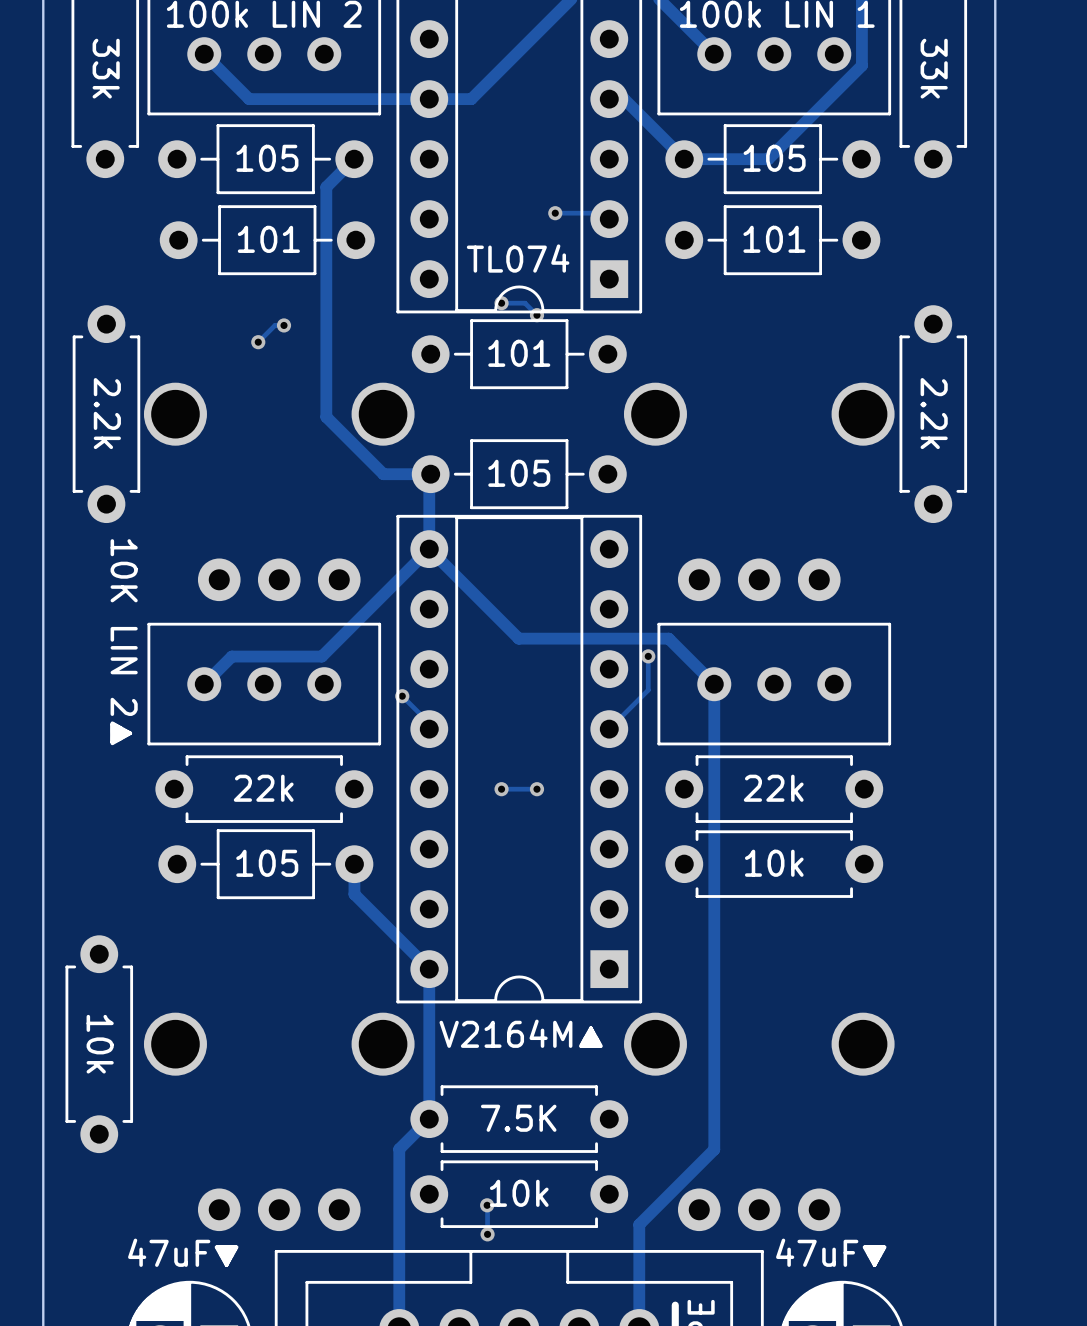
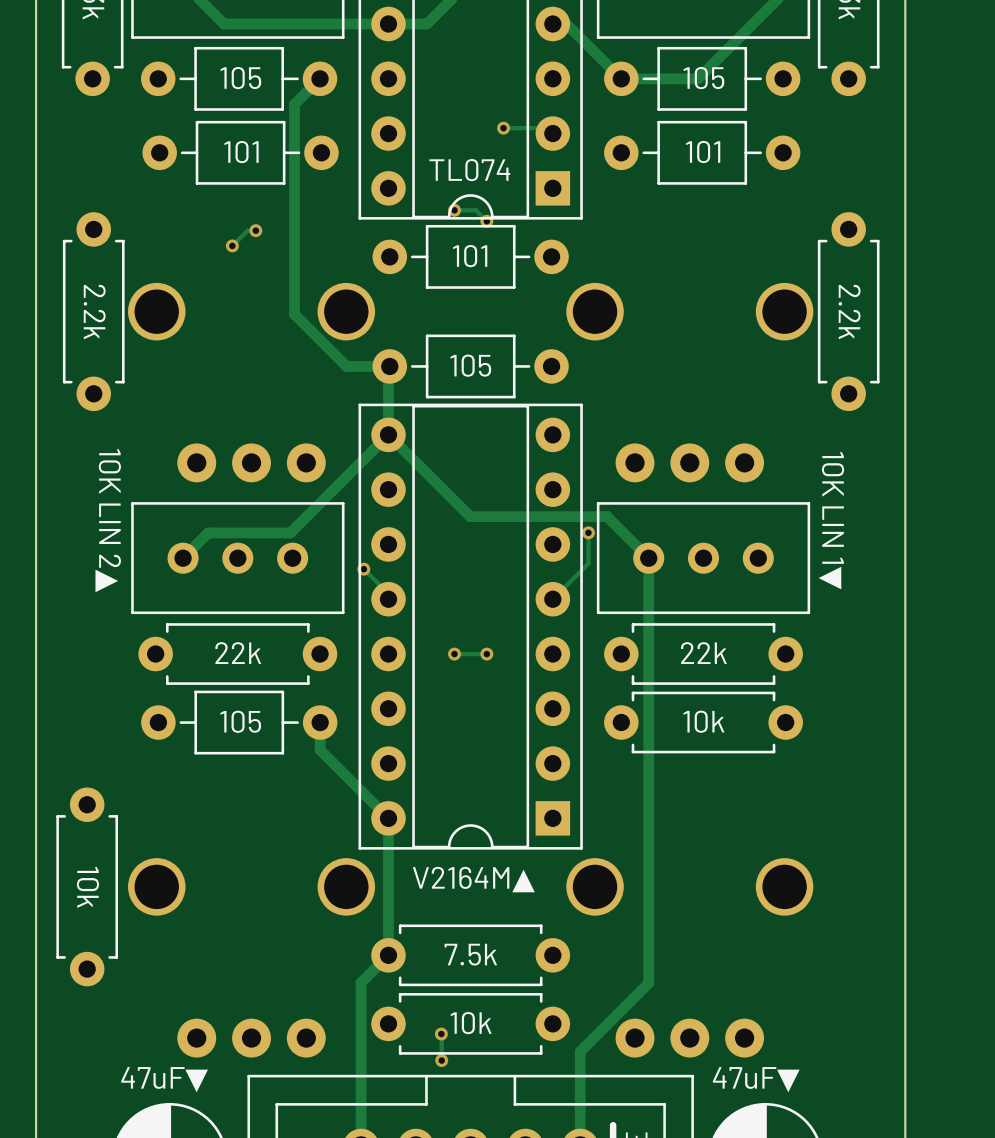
part text: none -> 10K LIN 1▼ (831, 520)
part value: 7.5K (518, 1118) -> 7.5k (470, 954)

